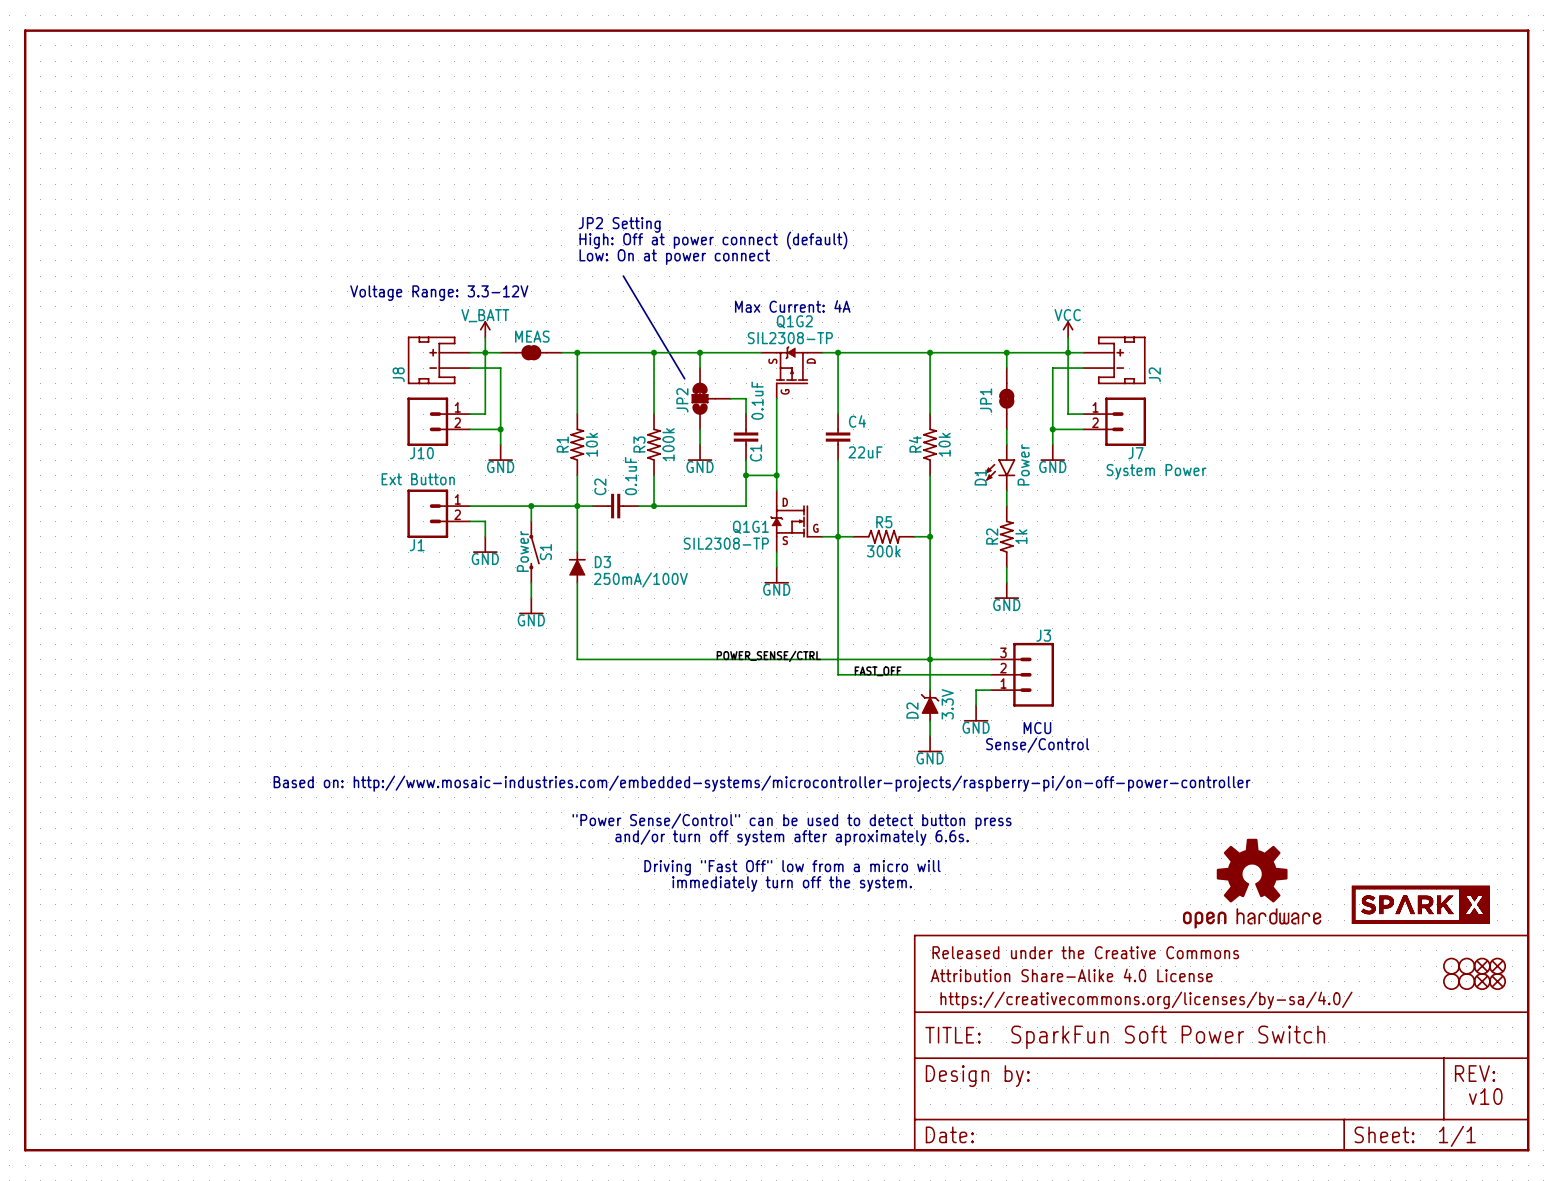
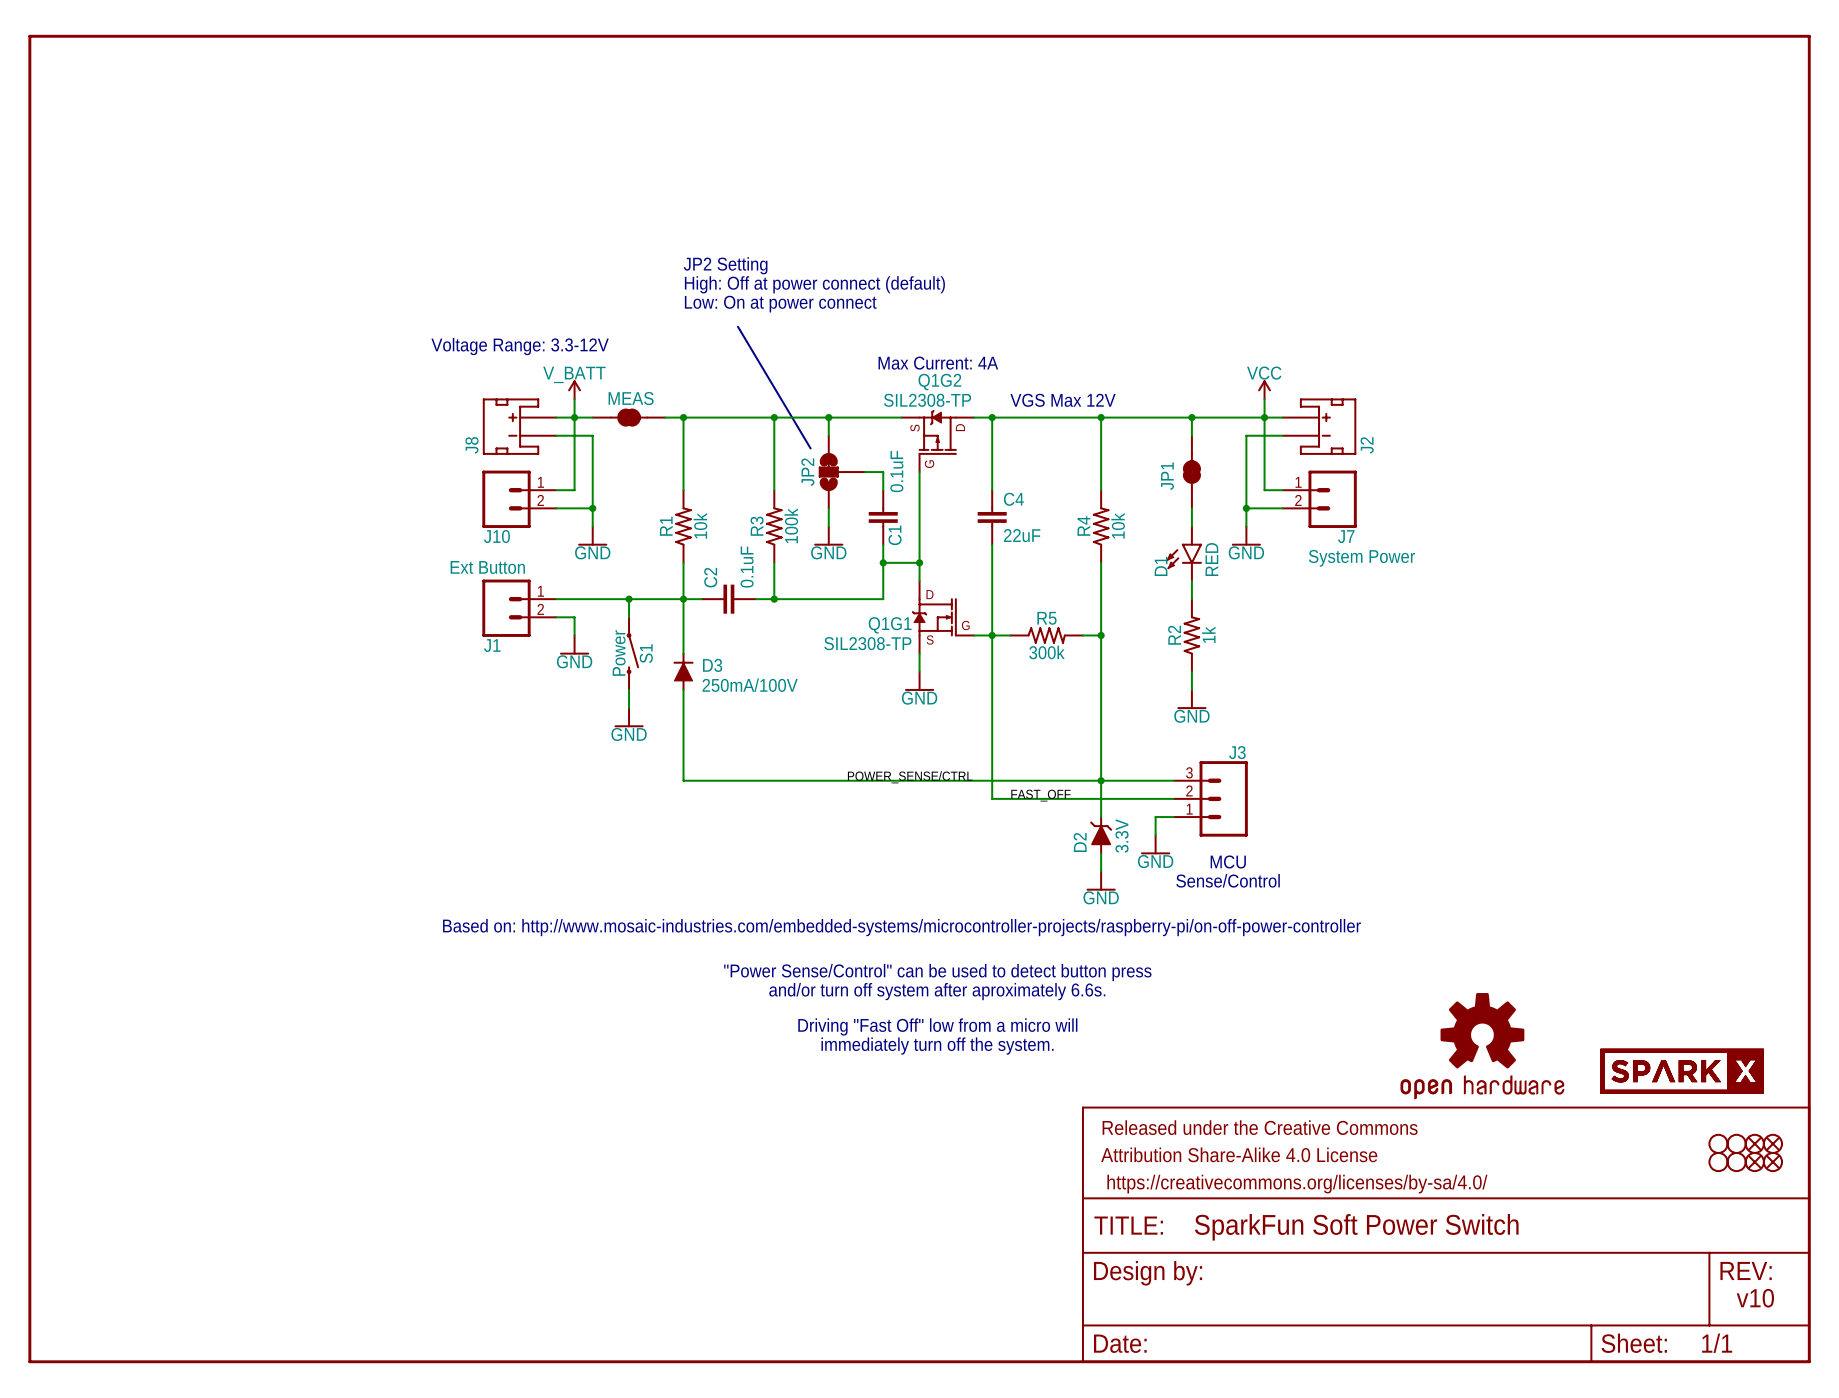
text: none -> VGS Max 12V (1063, 400)
D1 value: Power (1023, 465) -> RED (1211, 559)

